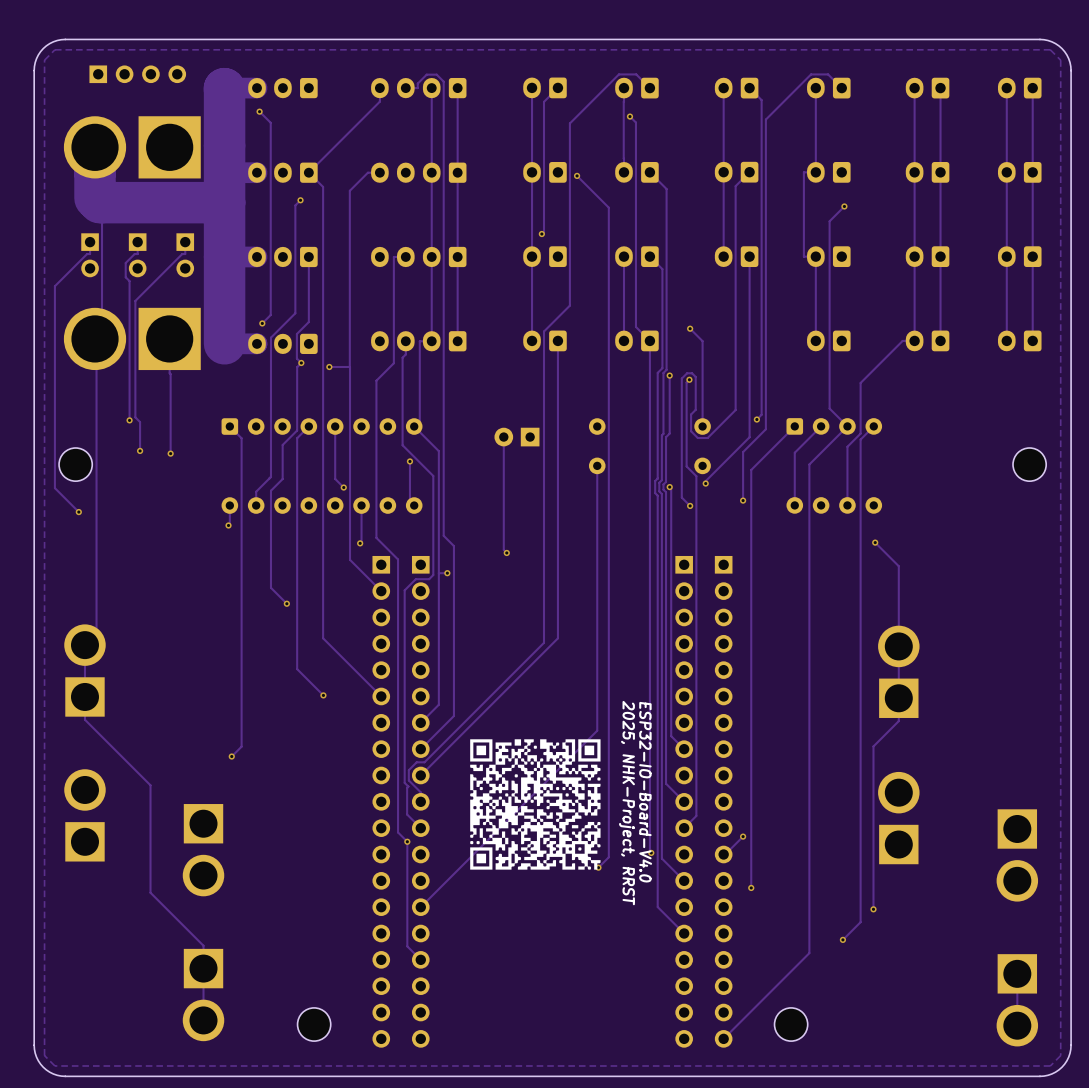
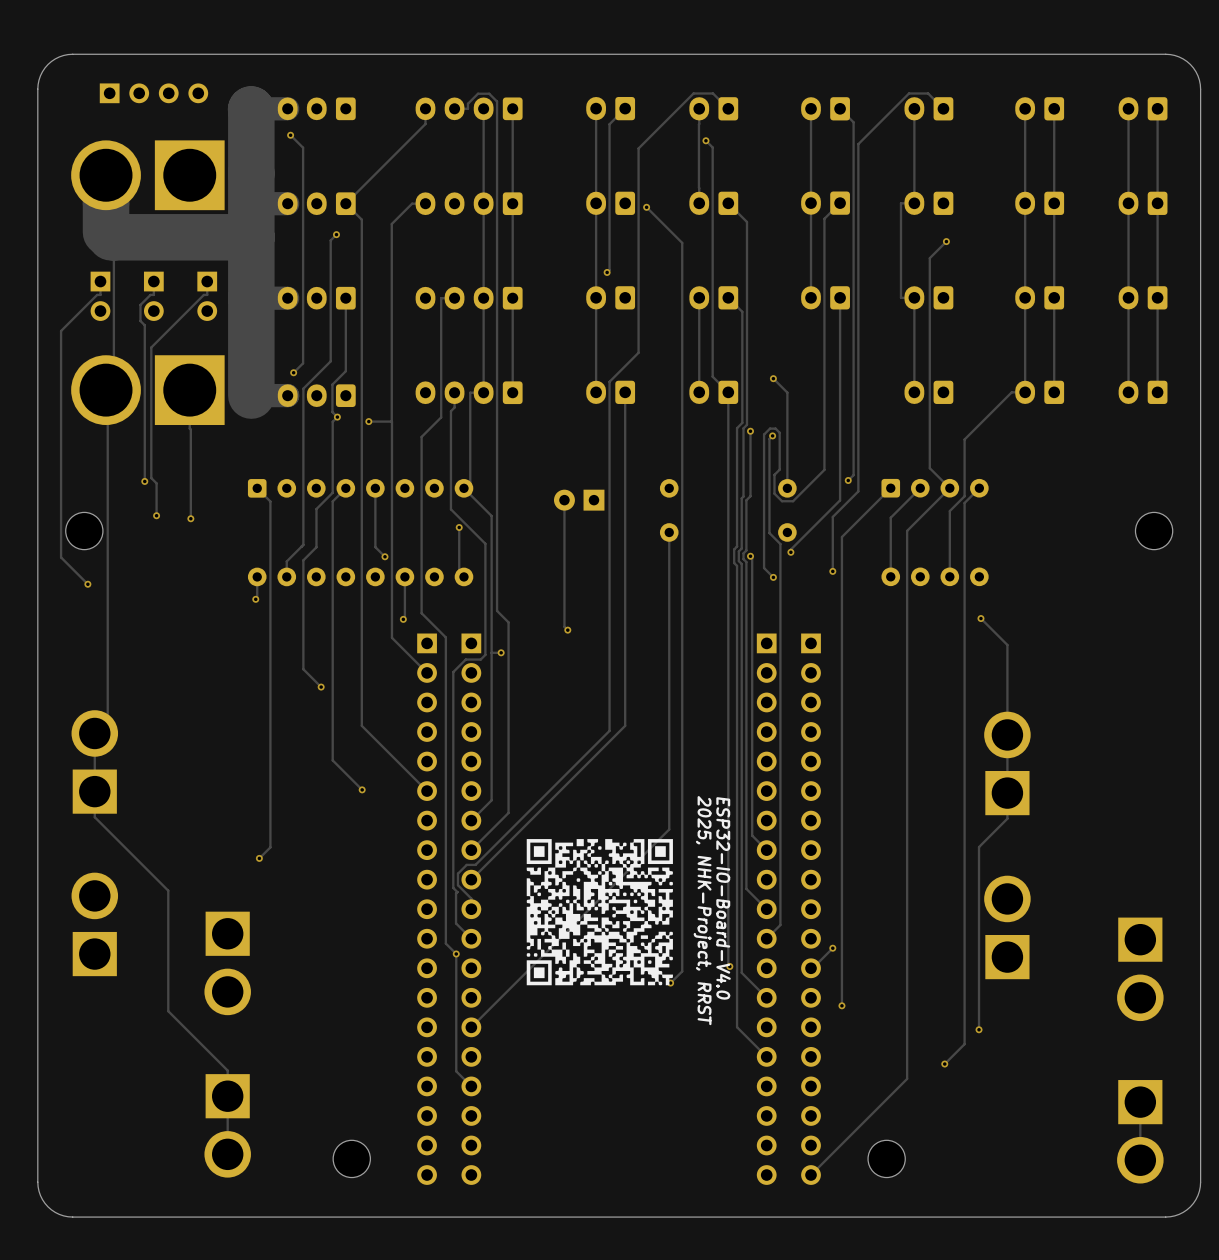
zone outline: (1050, 49) (54, 49) (44, 60) (44, 1055) (54, 1065) (1050, 1065) (1060, 1055) (1060, 60) (1050, 49) -> none

